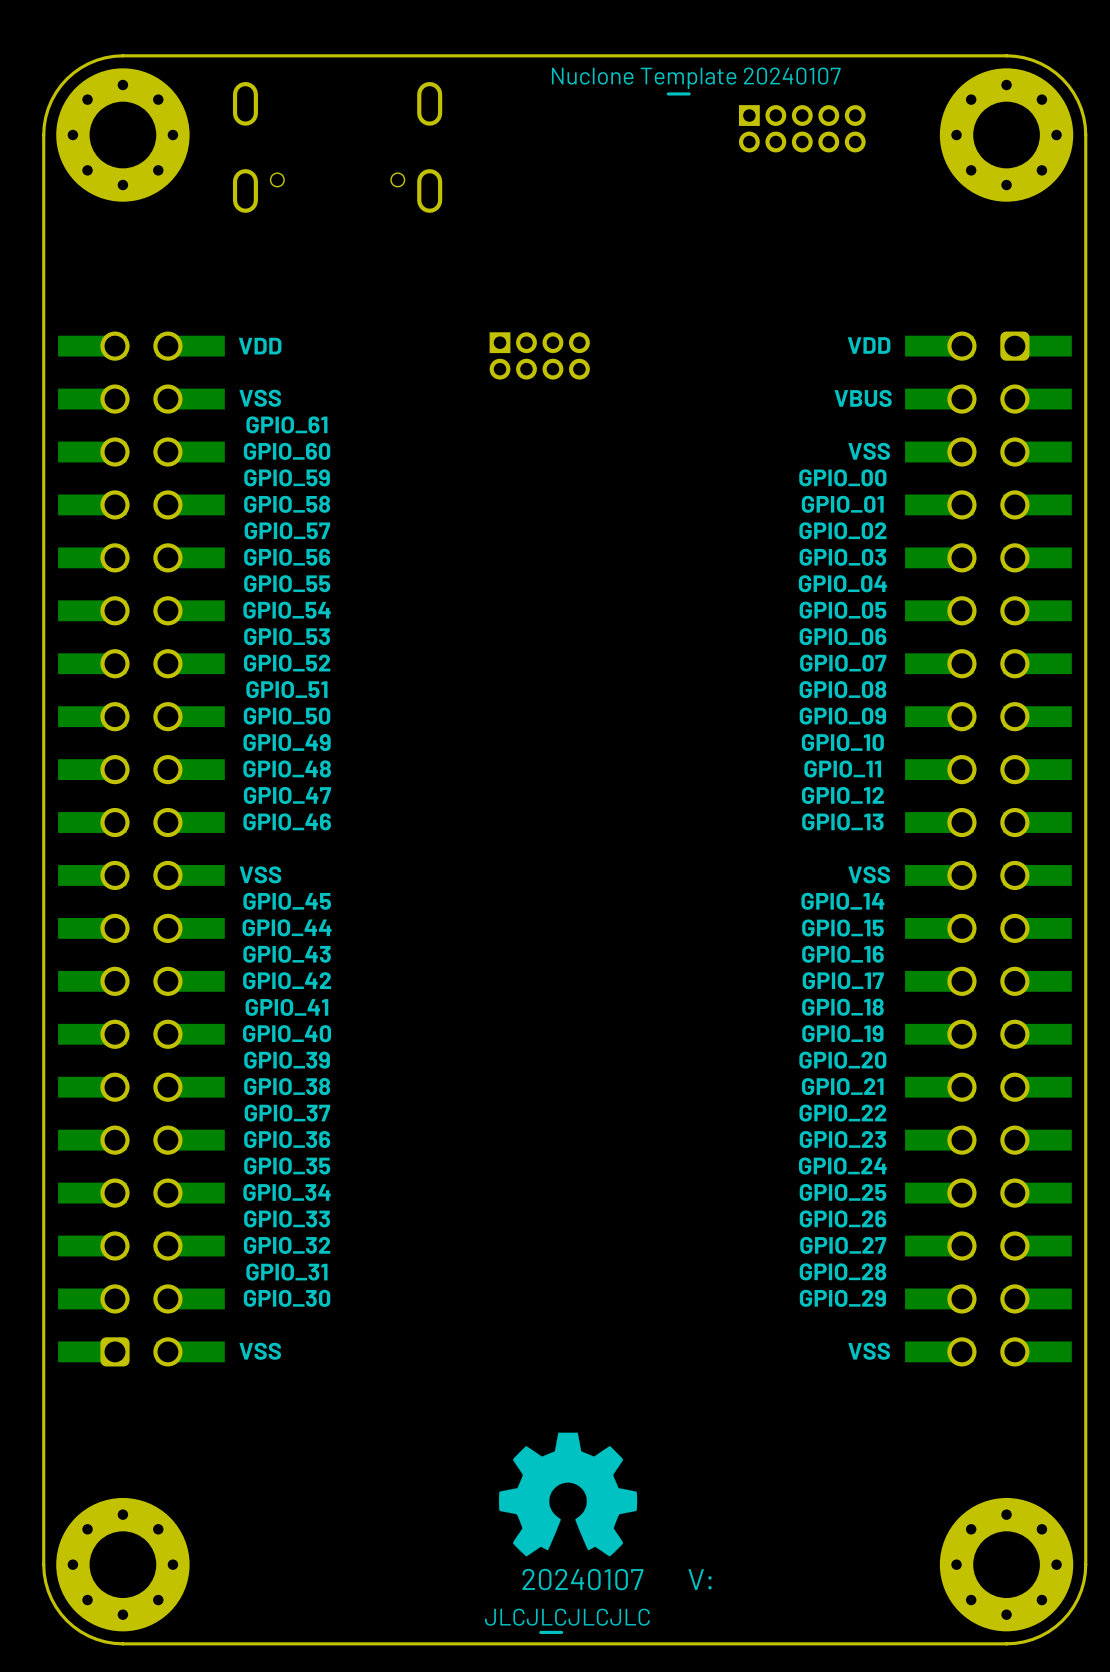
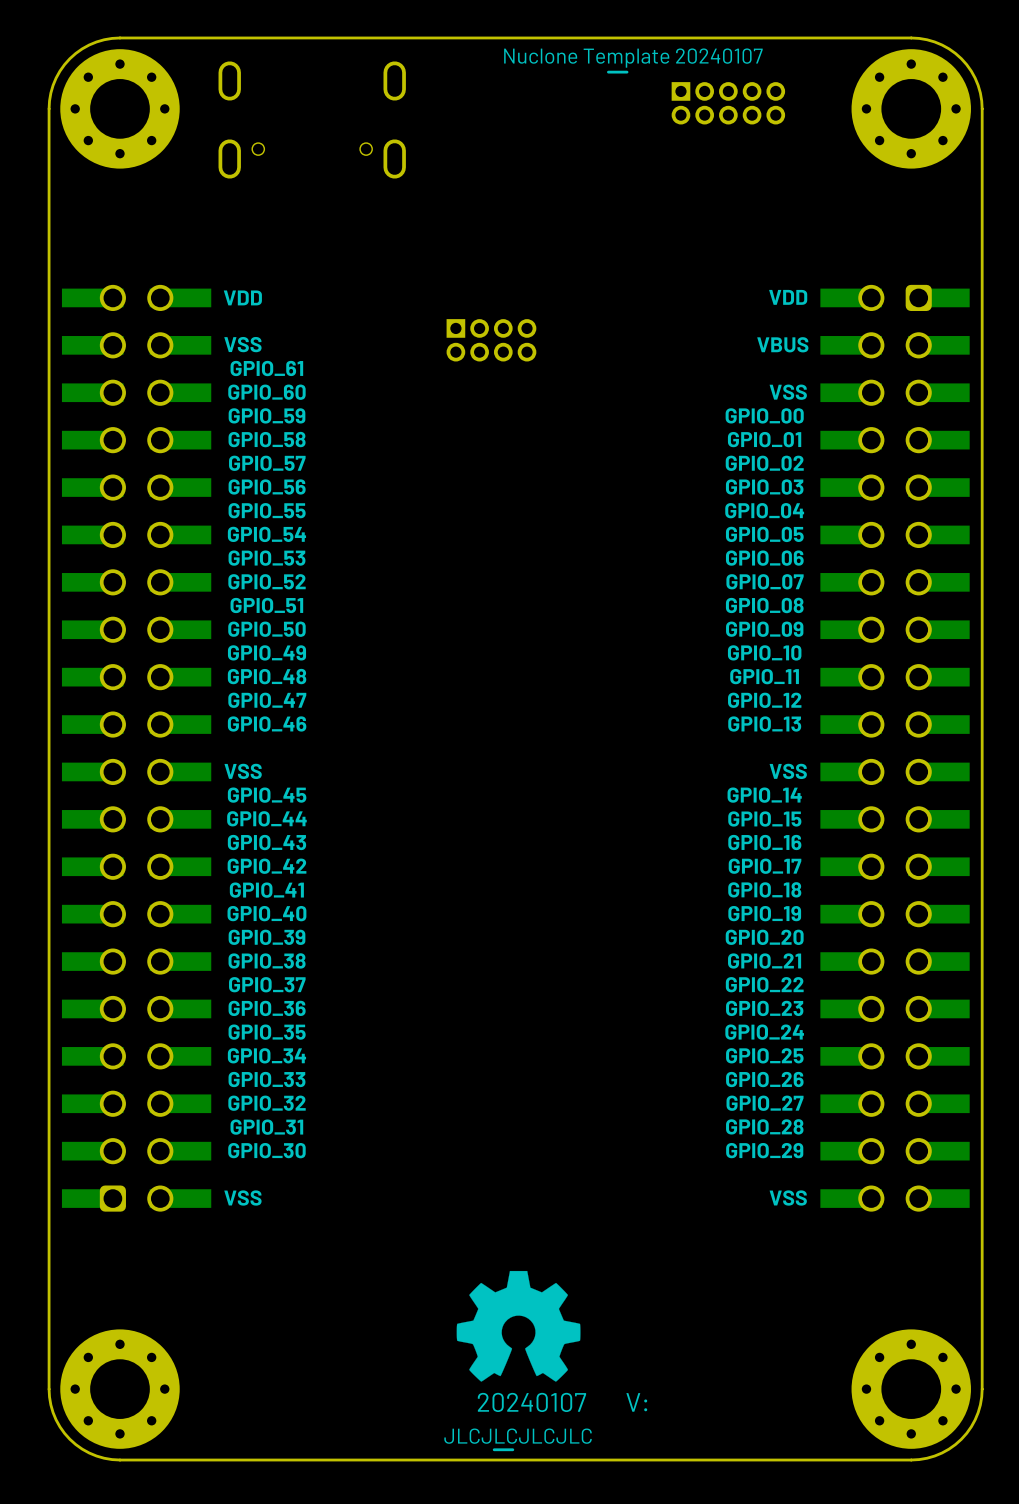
part position: (539, 355) -> (491, 340)

